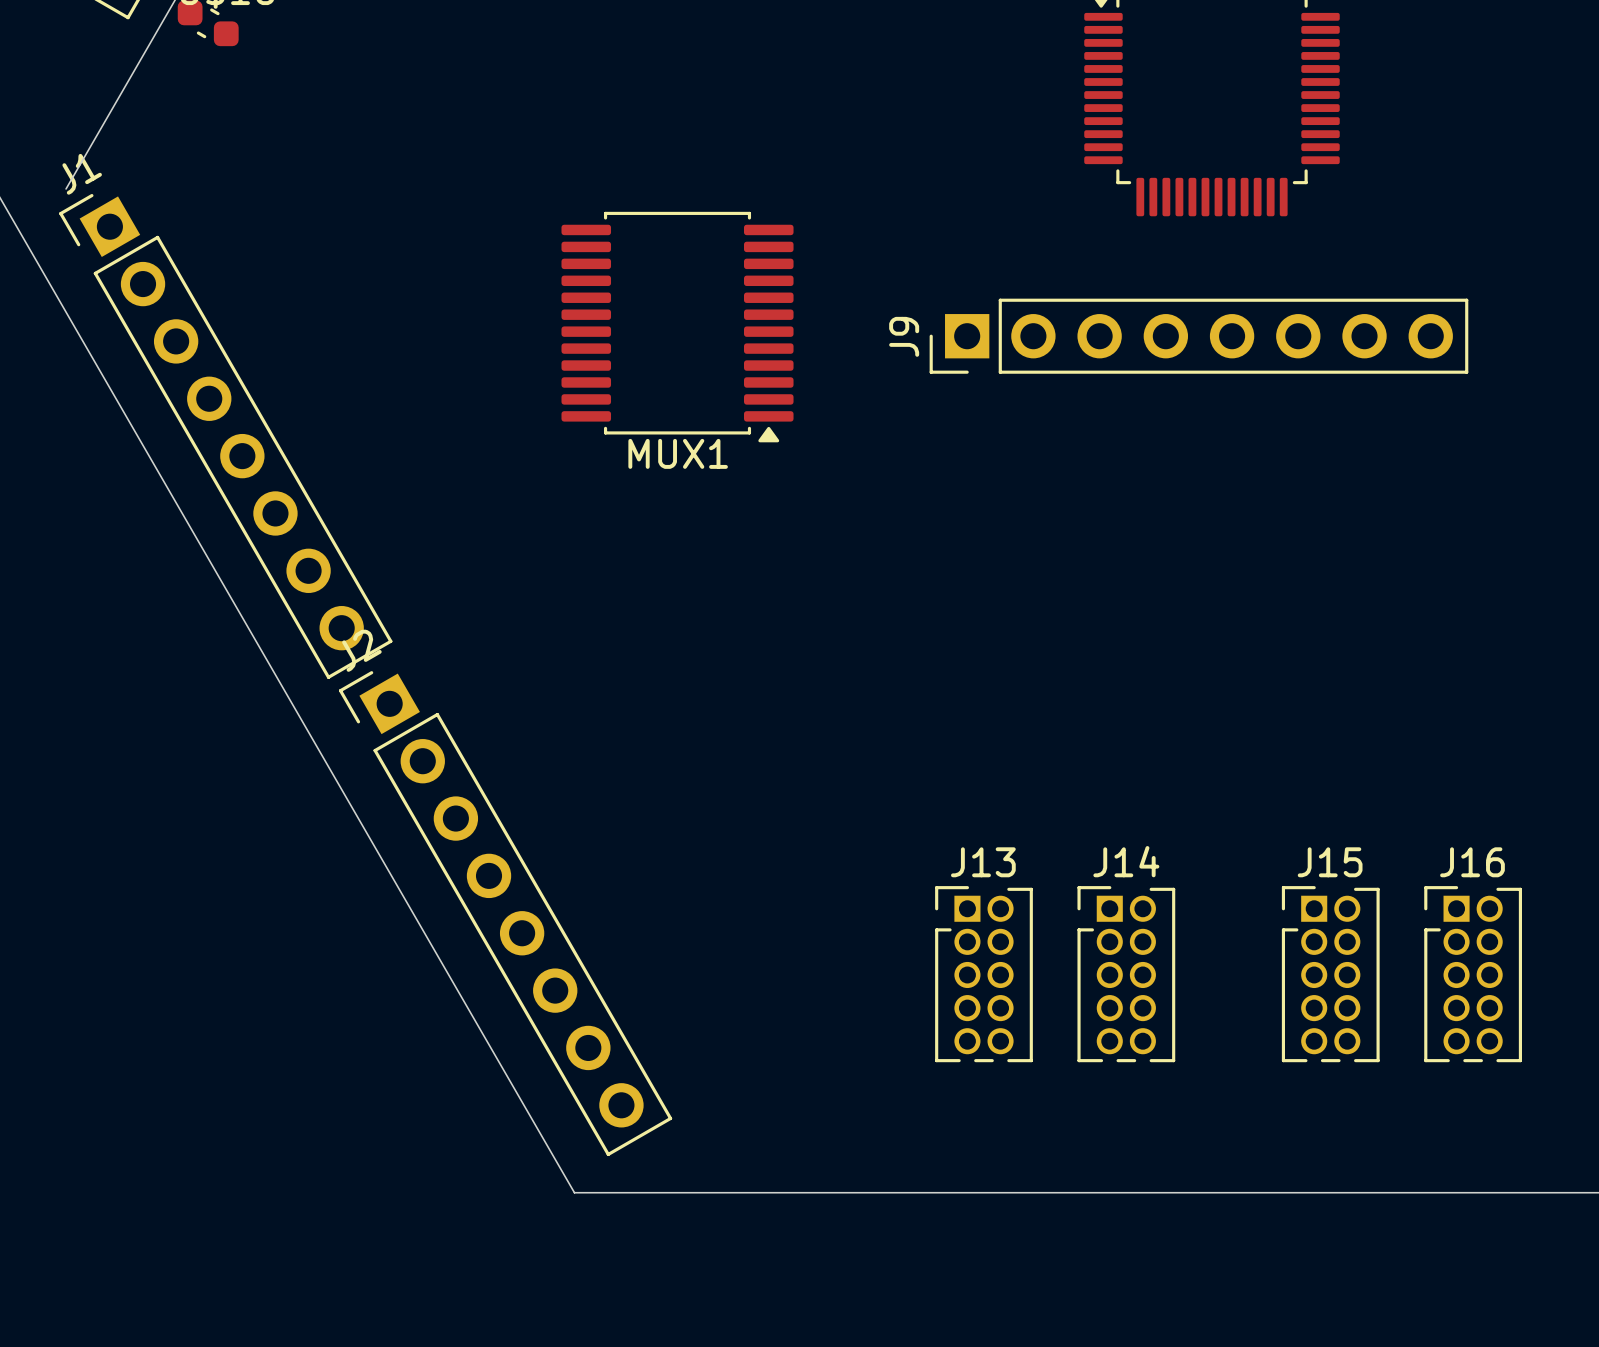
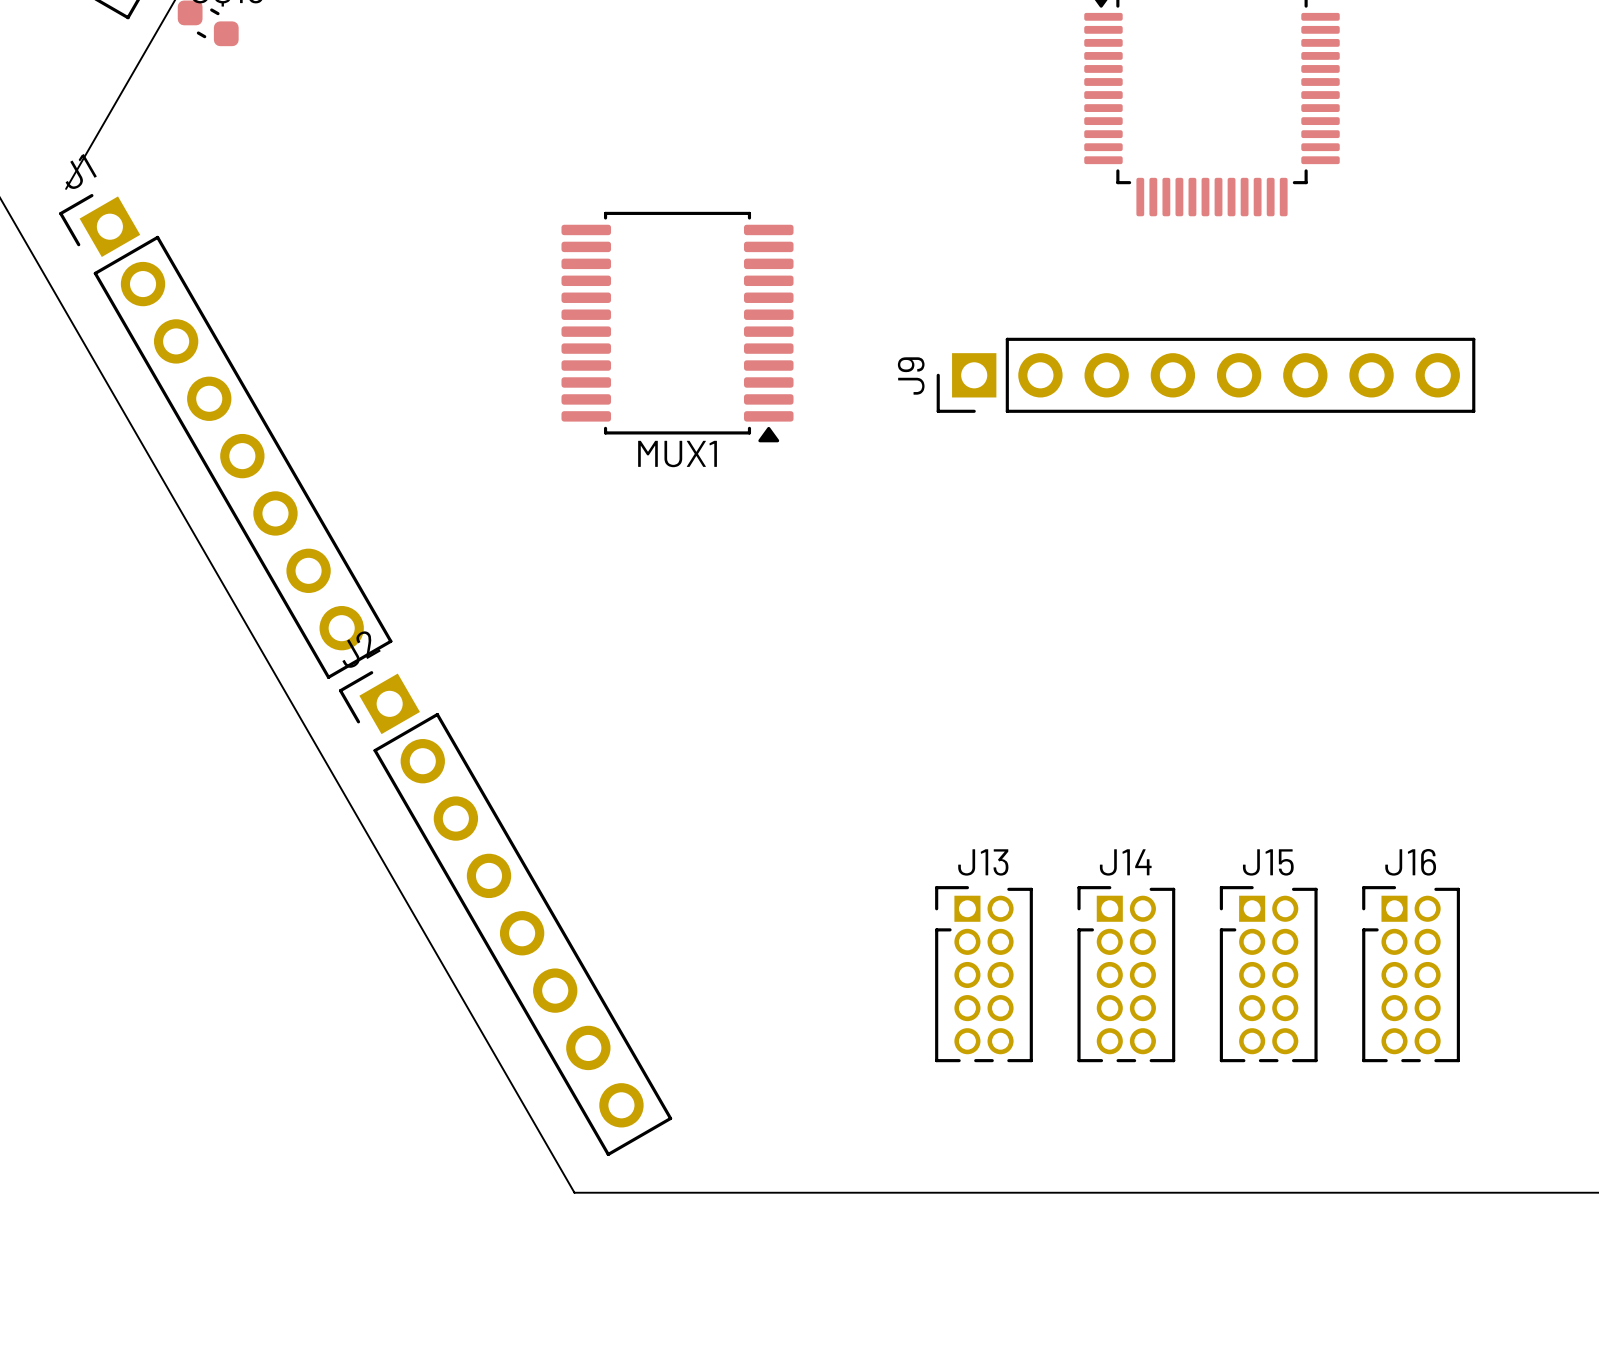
J9 position: (1198, 336) -> (1206, 375)
J15 position: (1330, 974) -> (1268, 974)
J16 position: (1473, 974) -> (1411, 974)

